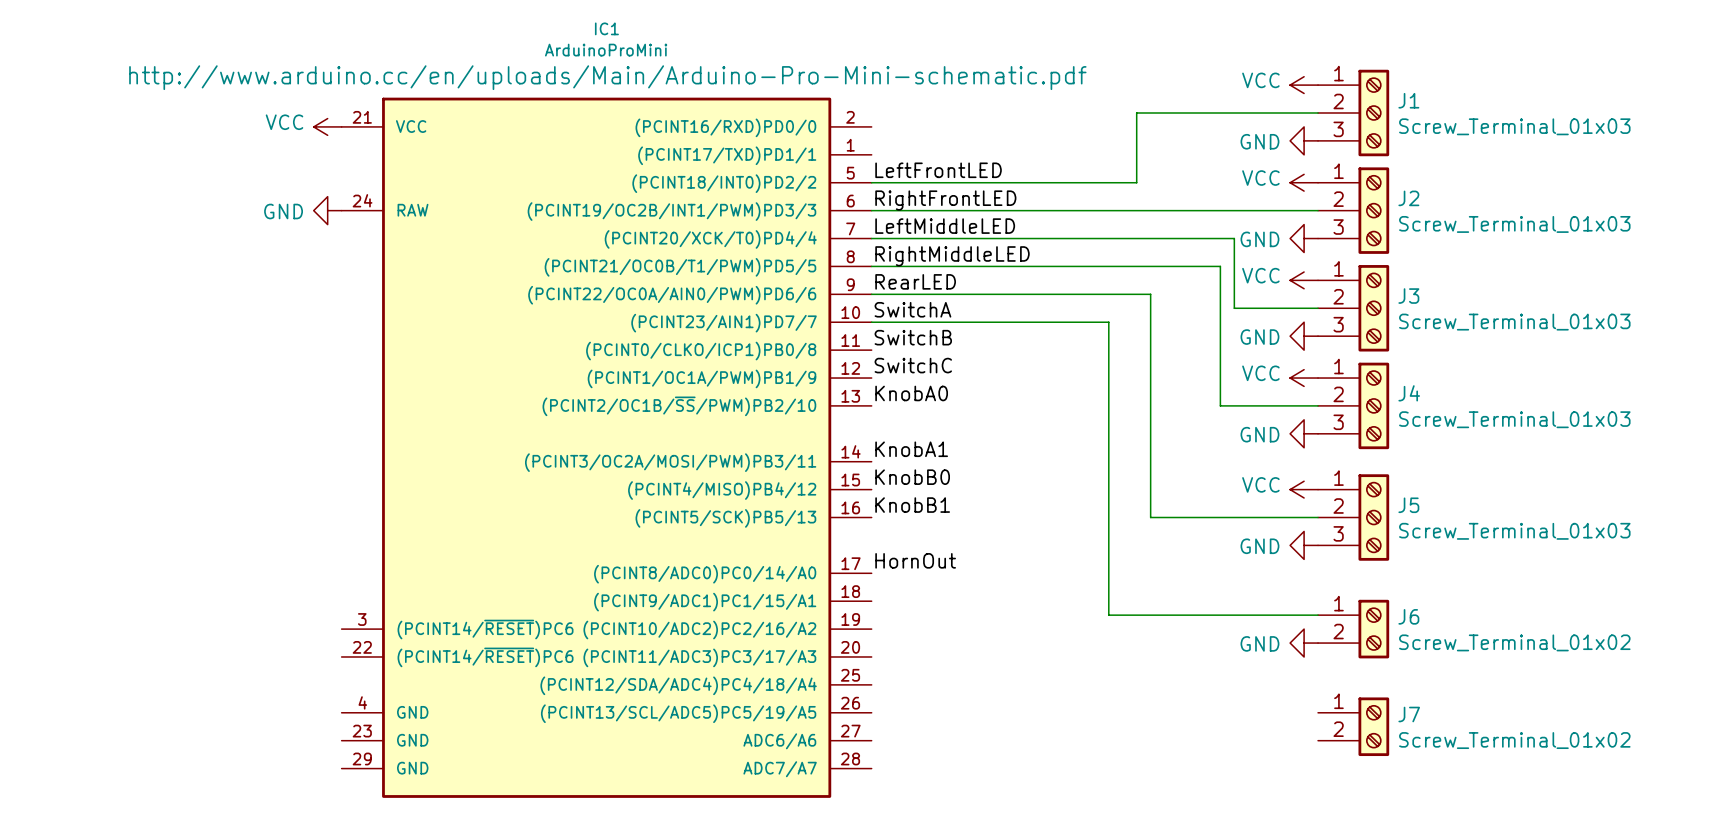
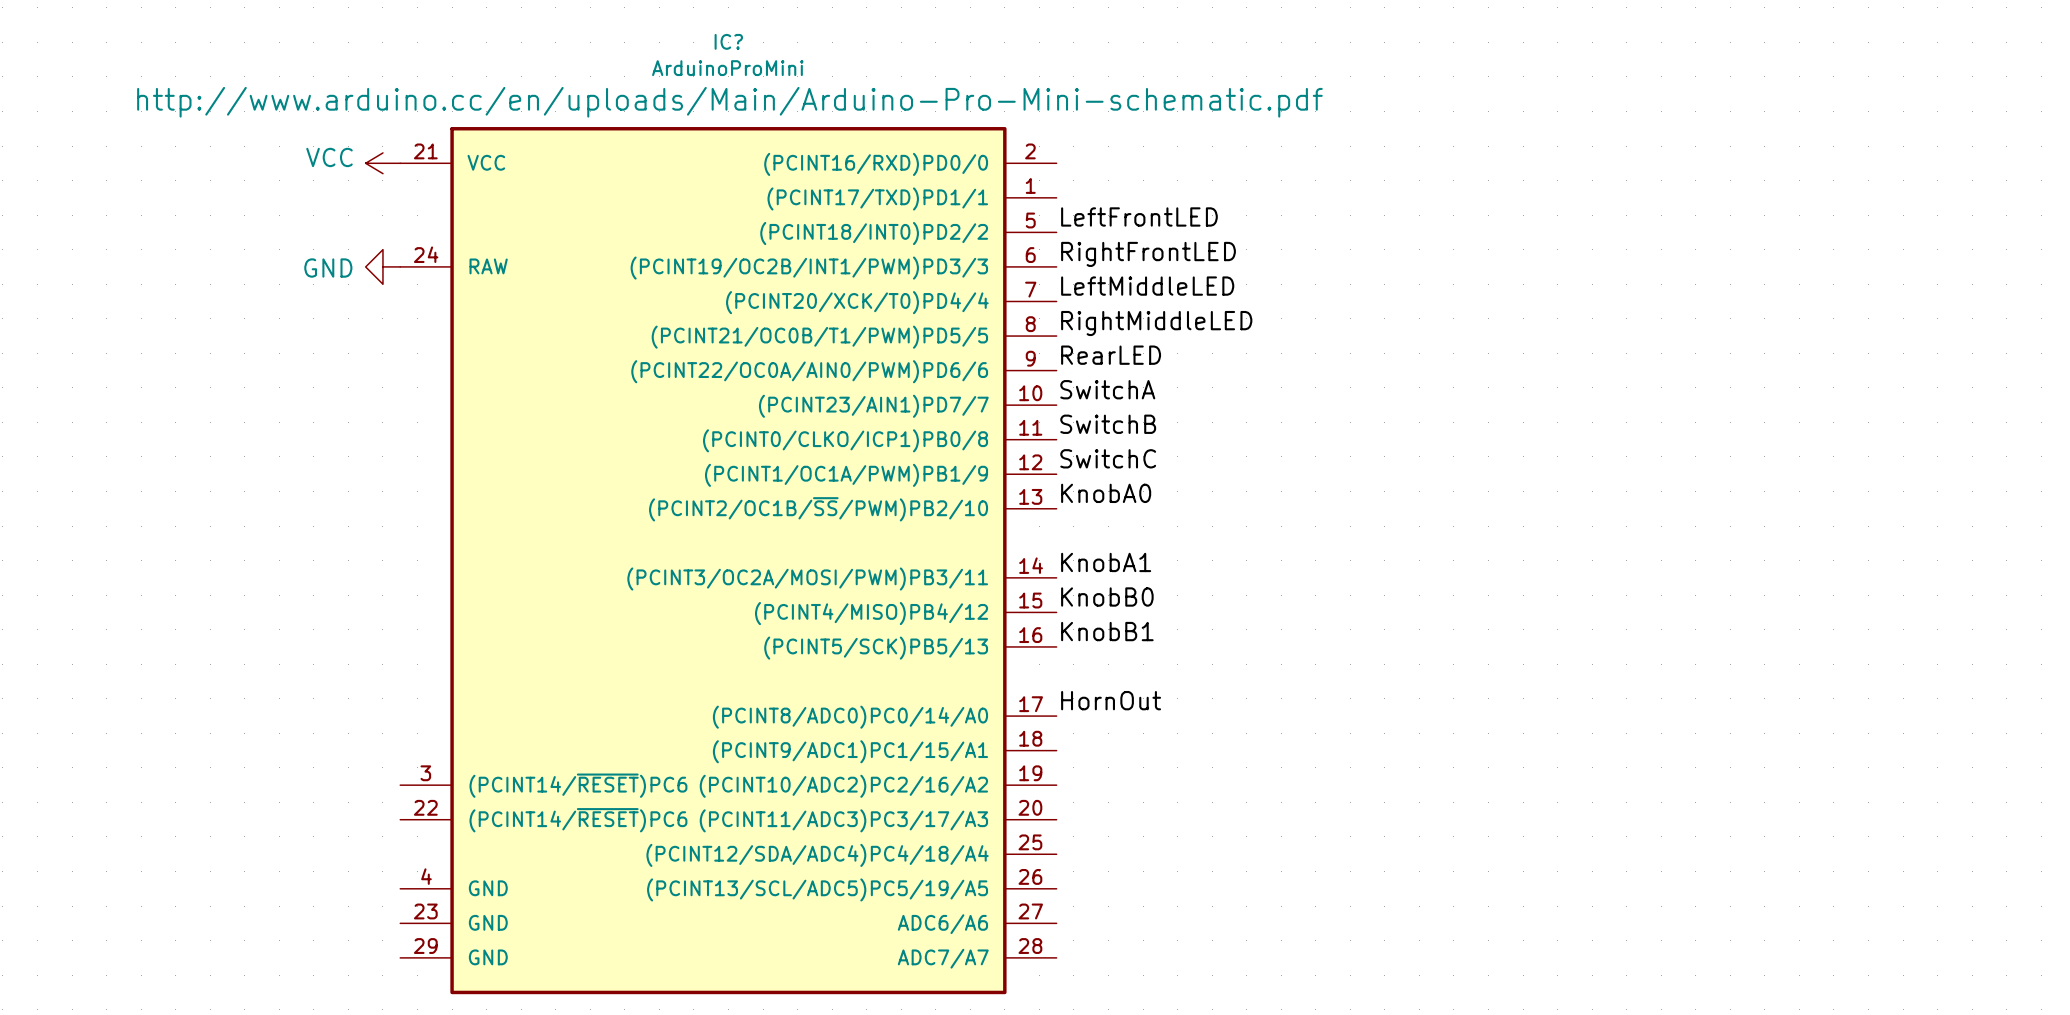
IC1 name: IC1 (606, 28) -> IC? (728, 41)
power symbol: VCC (1304, 85) -> none
wire: (1318, 112) (1136, 112) (1136, 182) (871, 182) -> none
J1: Screw_Terminal_01x03 (1353, 112) -> none
power symbol: GND (1304, 140) -> none
power symbol: VCC (1304, 182) -> none
wire: (871, 210) (1318, 210) -> none
J2: Screw_Terminal_01x03 (1353, 210) -> none
wire: (871, 238) (1234, 238) (1234, 308) (1318, 308) -> none
power symbol: GND (1304, 238) -> none
wire: (871, 266) (1220, 266) (1220, 405) (1318, 405) -> none
power symbol: VCC (1304, 280) -> none
wire: (871, 294) (1150, 294) (1150, 517) (1318, 517) -> none
J3: Screw_Terminal_01x03 (1353, 308) -> none
wire: (871, 322) (1108, 322) (1108, 615) (1318, 615) -> none
power symbol: GND (1304, 336) -> none
power symbol: VCC (1304, 378) -> none
J4: Screw_Terminal_01x03 (1353, 405) -> none
power symbol: GND (1304, 433) -> none
power symbol: VCC (1304, 489) -> none
J5: Screw_Terminal_01x03 (1353, 517) -> none
power symbol: GND (1304, 545) -> none
J6: Screw_Terminal_01x02 (1353, 629) -> none
power symbol: GND (1304, 643) -> none
J7: Screw_Terminal_01x02 (1353, 726) -> none

